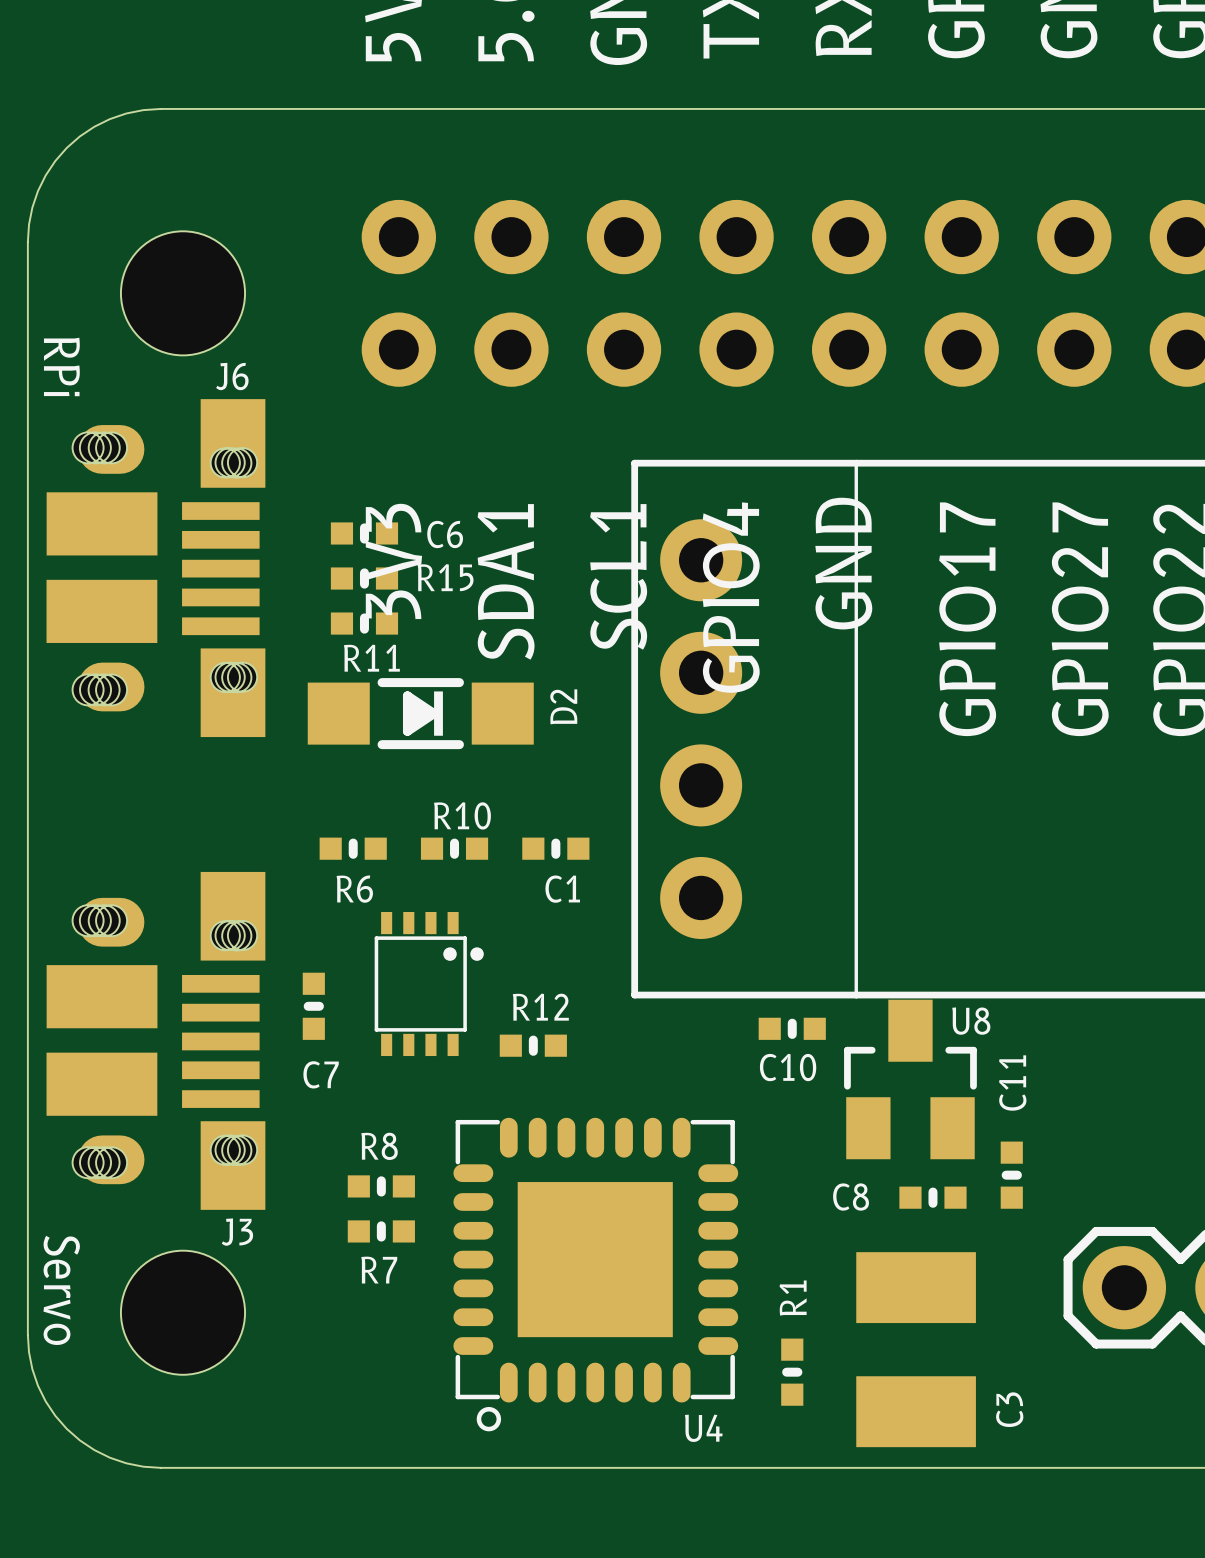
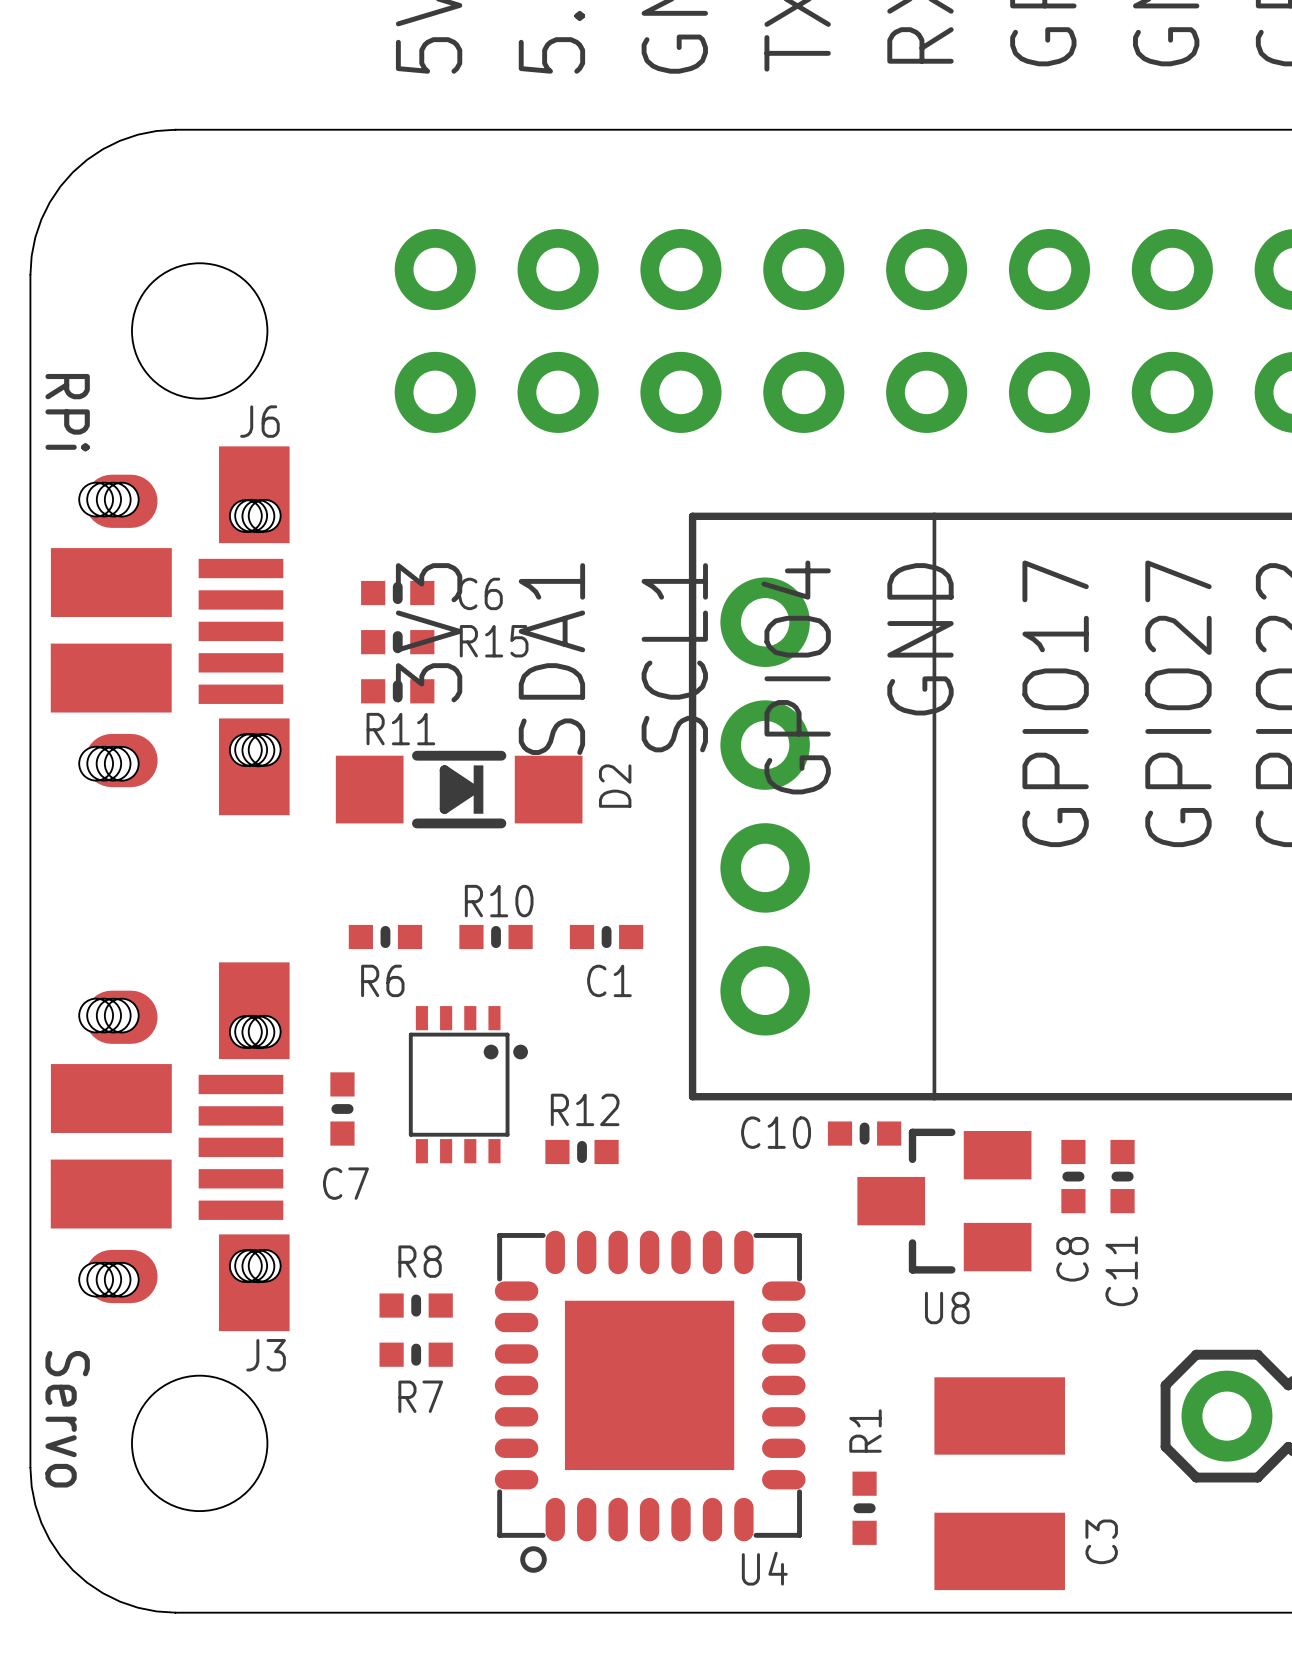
U8 name position: U8 (971, 1021) -> U8 (947, 1308)
C10 name position: C10 (788, 1067) -> C10 (776, 1132)
U8 rotation: 0° (910, 1079) -> 90° counterclockwise (944, 1201)
C11 name position: C11 (1012, 1083) -> C11 (1121, 1271)
C11 position: (1011, 1175) -> (1122, 1176)
C8 name position: C8 (851, 1197) -> C8 (1072, 1259)
C8 rotation: 0° (932, 1197) -> 90° clockwise (1073, 1176)
C8 position: (932, 1197) -> (1073, 1176)

